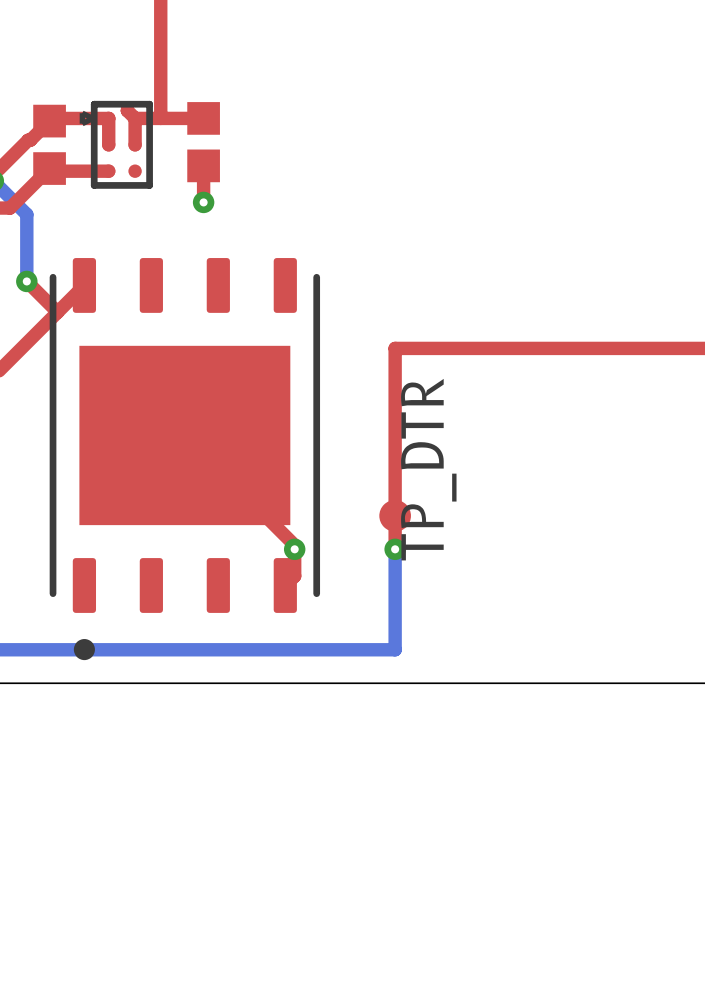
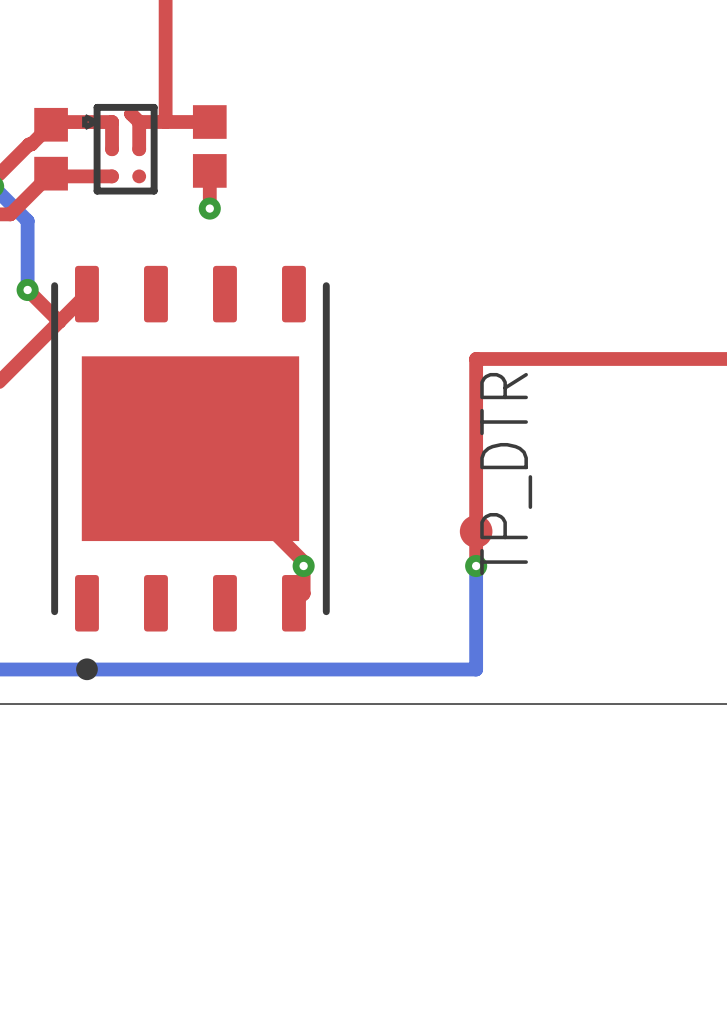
top track: (462, 348) (395, 348) (395, 549) -> (476, 358) (476, 565)
TP_DTR position: (395, 515) -> (476, 531)
bottom track: (395, 549) (395, 649) -> (476, 565) (476, 669) (407, 669)
via position: (395, 549) -> (476, 565)

